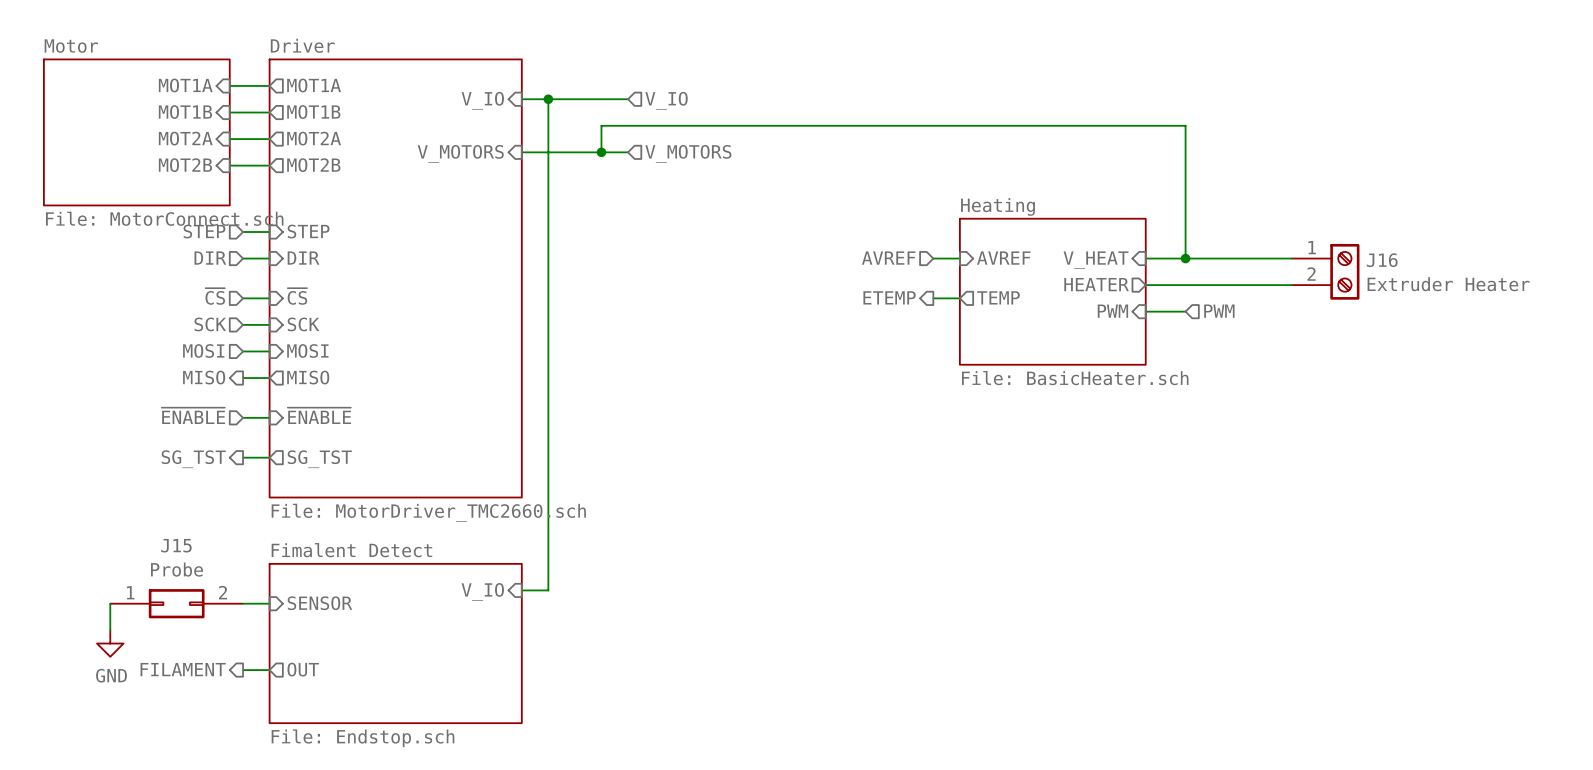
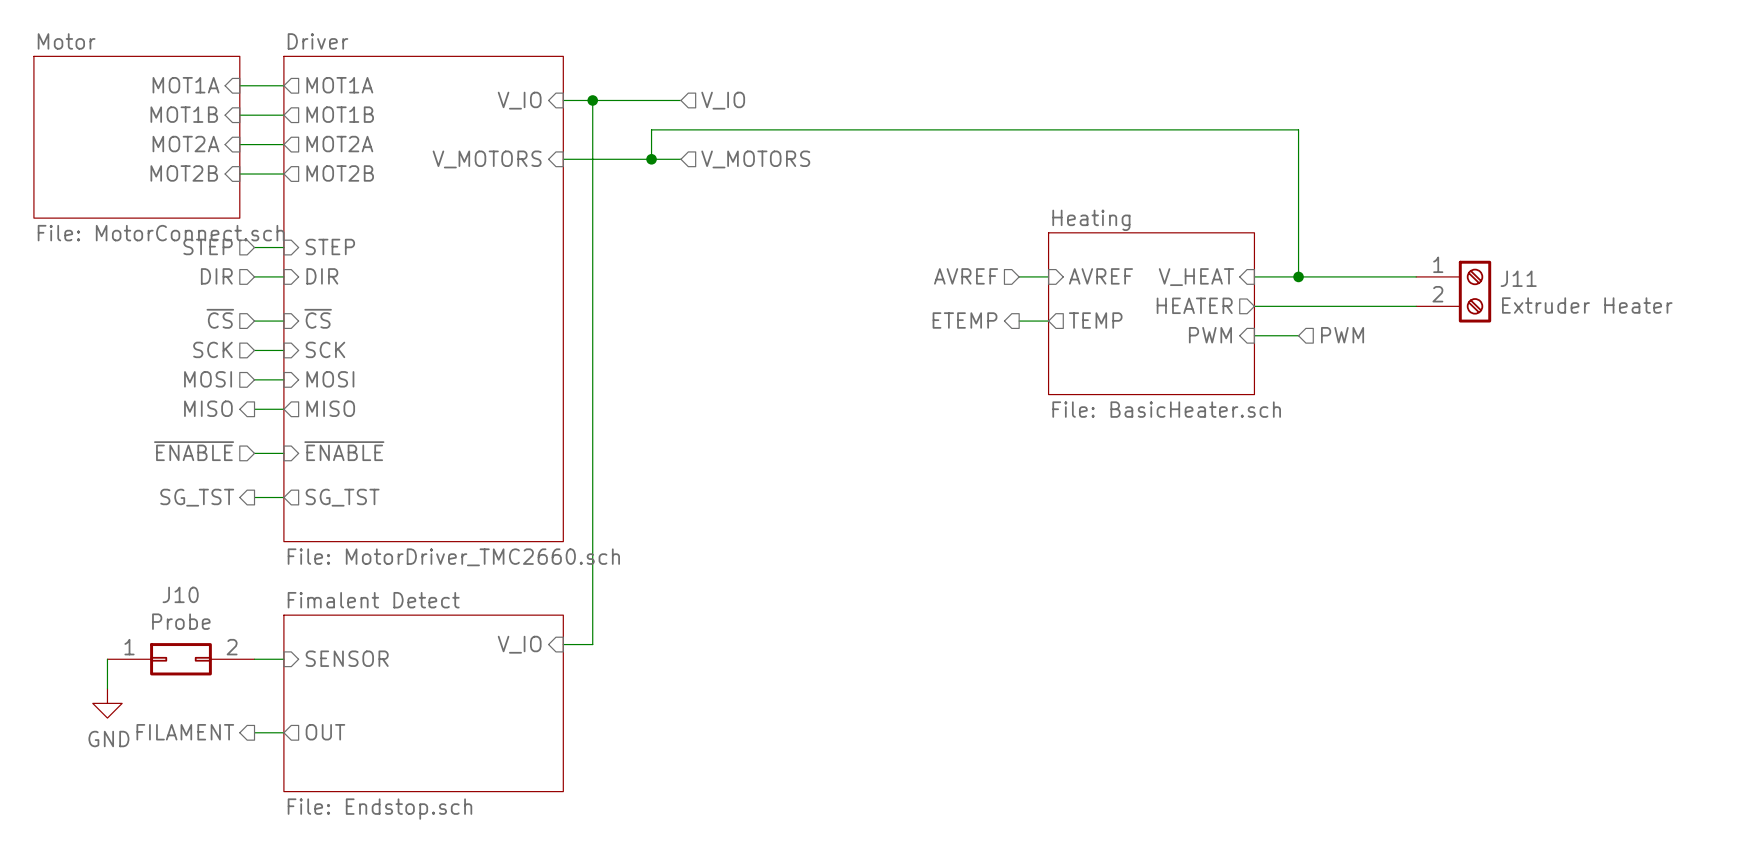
J16 name: J16 (1382, 260) -> J11 (1518, 278)
J15 name: J15 (176, 545) -> J10 (180, 594)

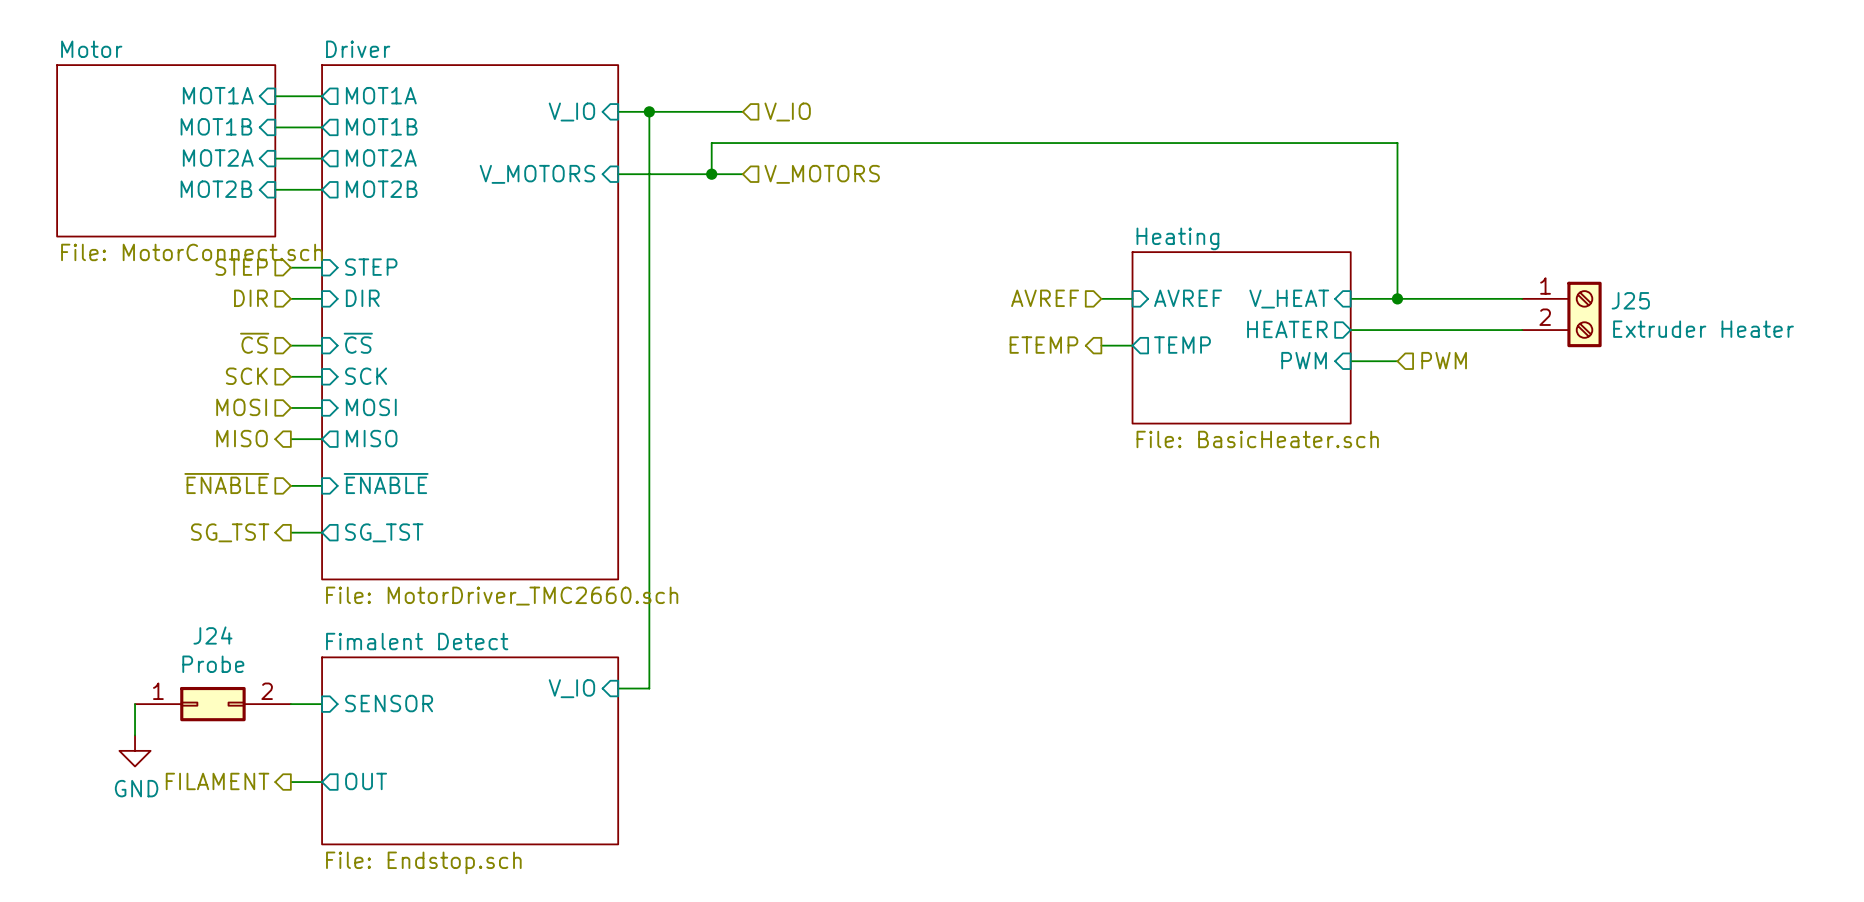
J11 name: J11 (1518, 278) -> J25 (1630, 300)
J10 name: J10 (180, 594) -> J24 (212, 635)

